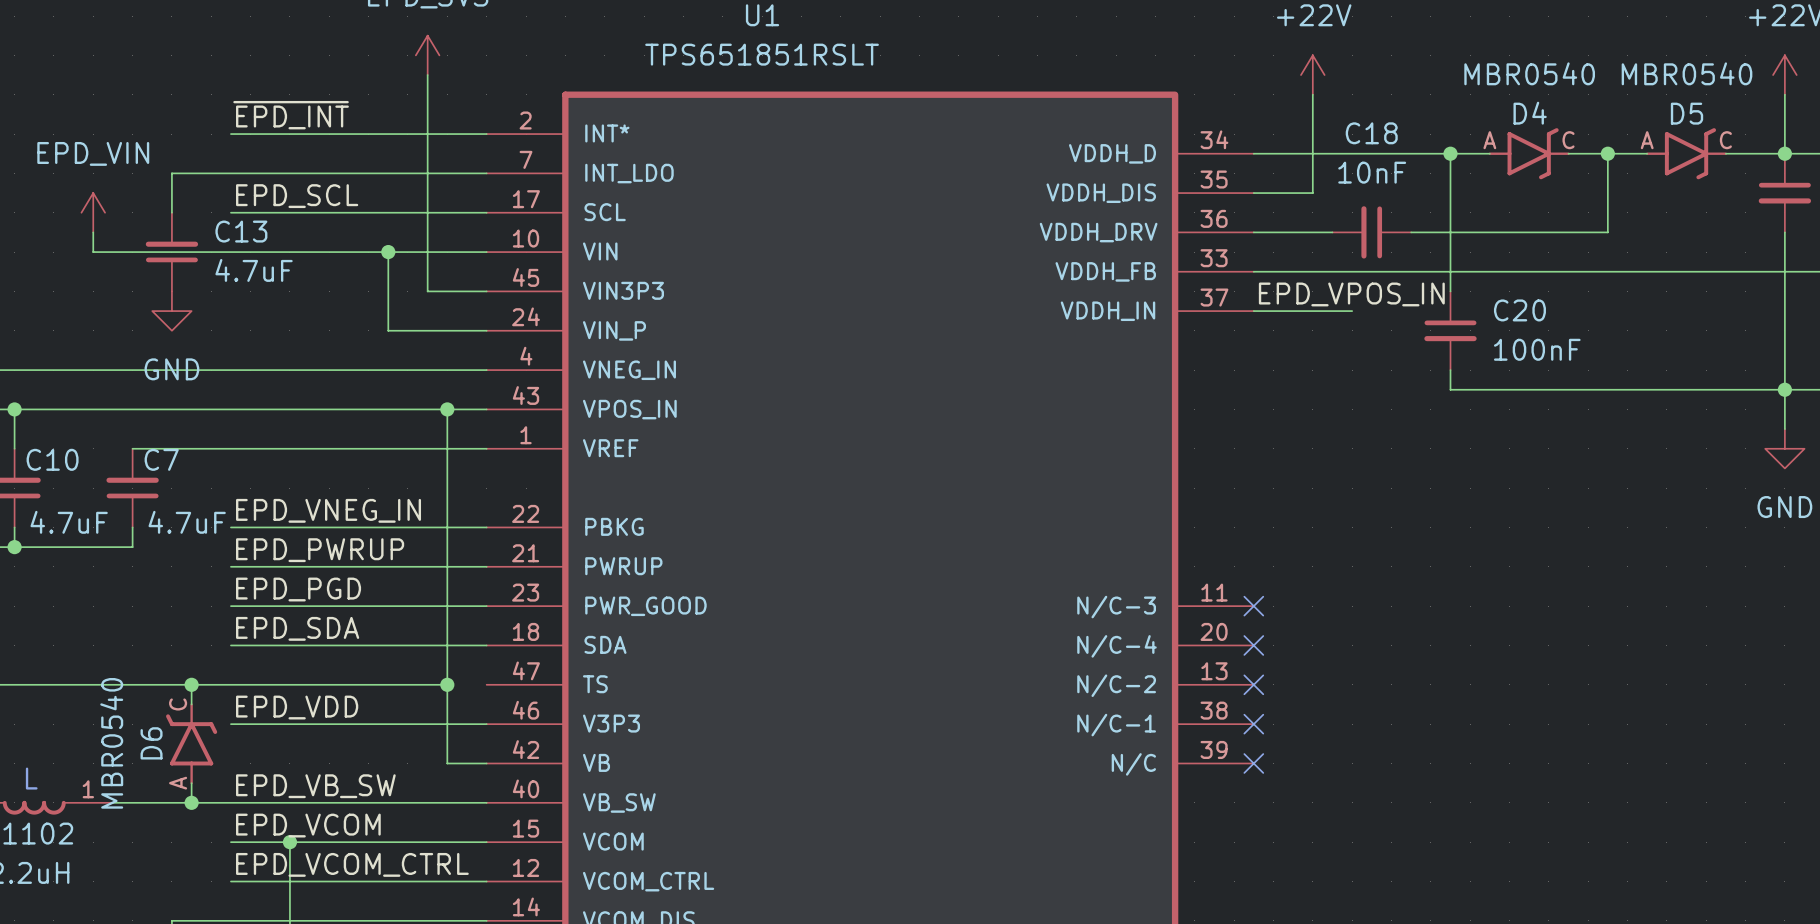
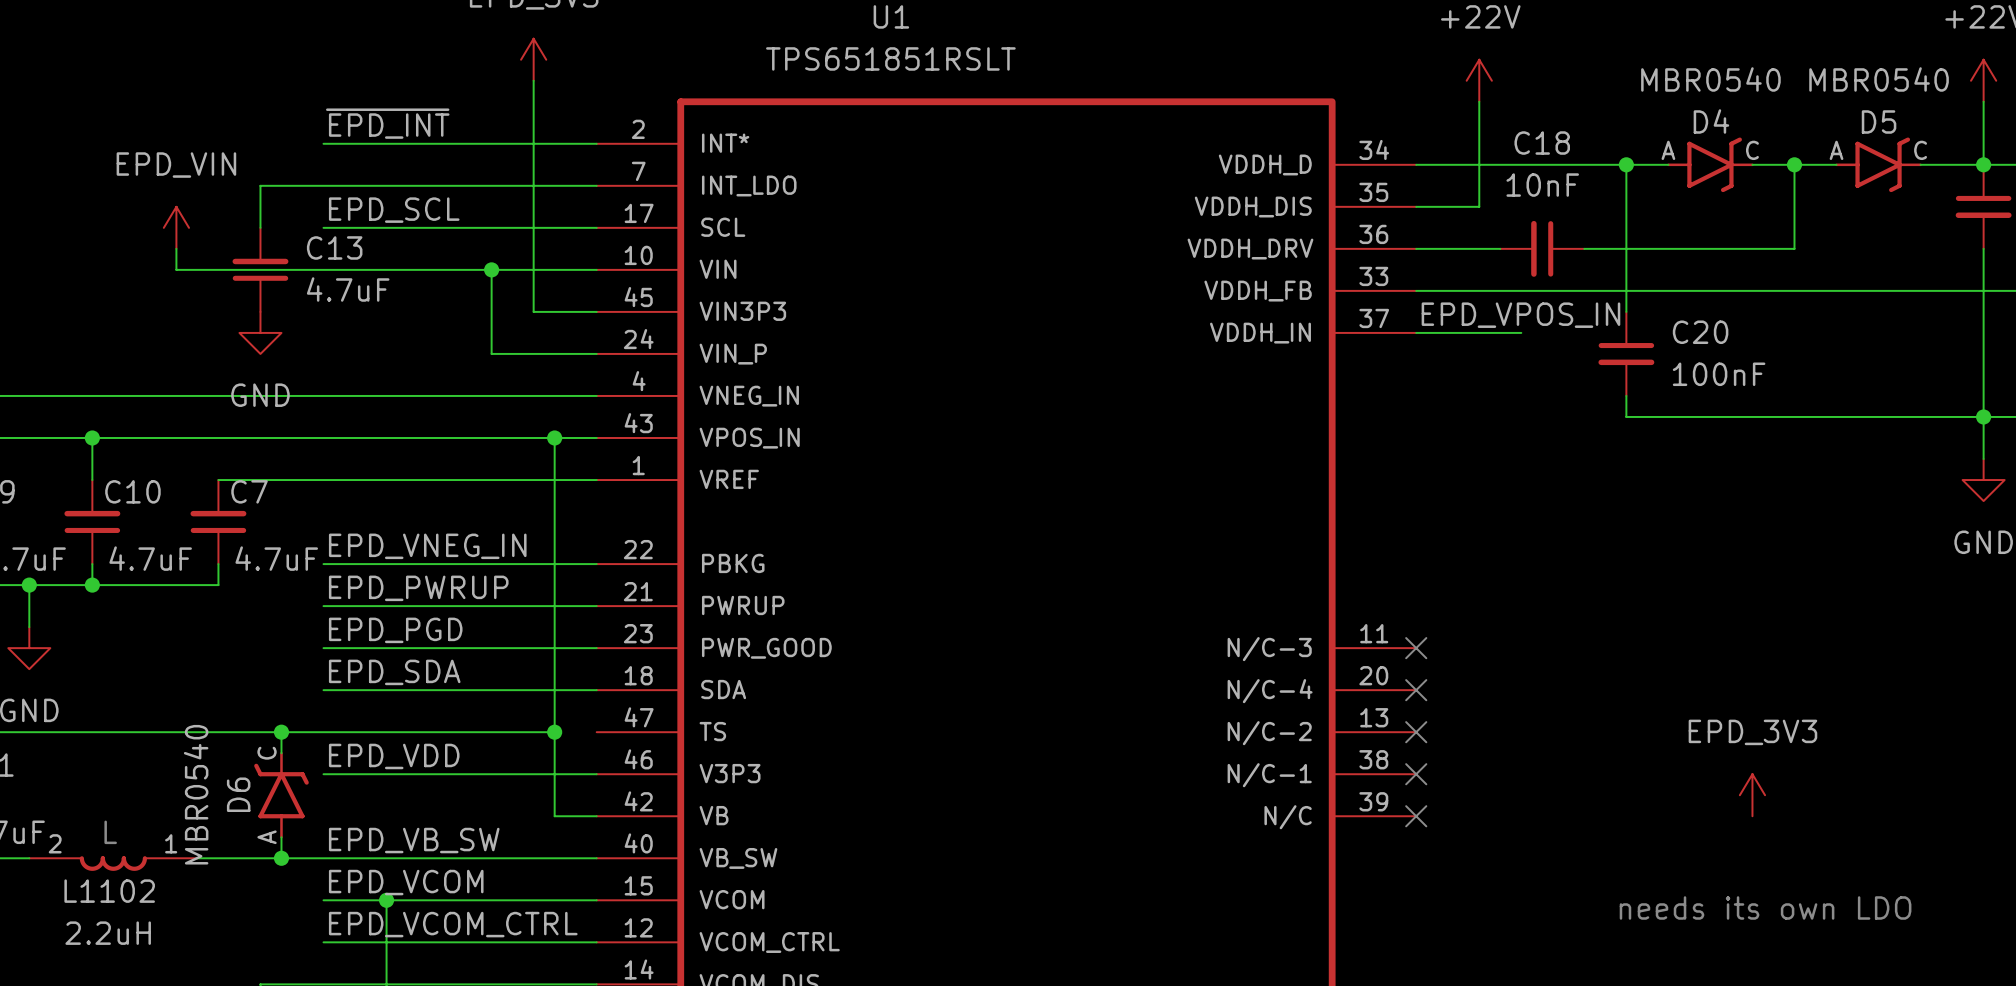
power symbol: none -> EPD_3V3 (1752, 795)
text: none -> needs its own LDO (1765, 907)

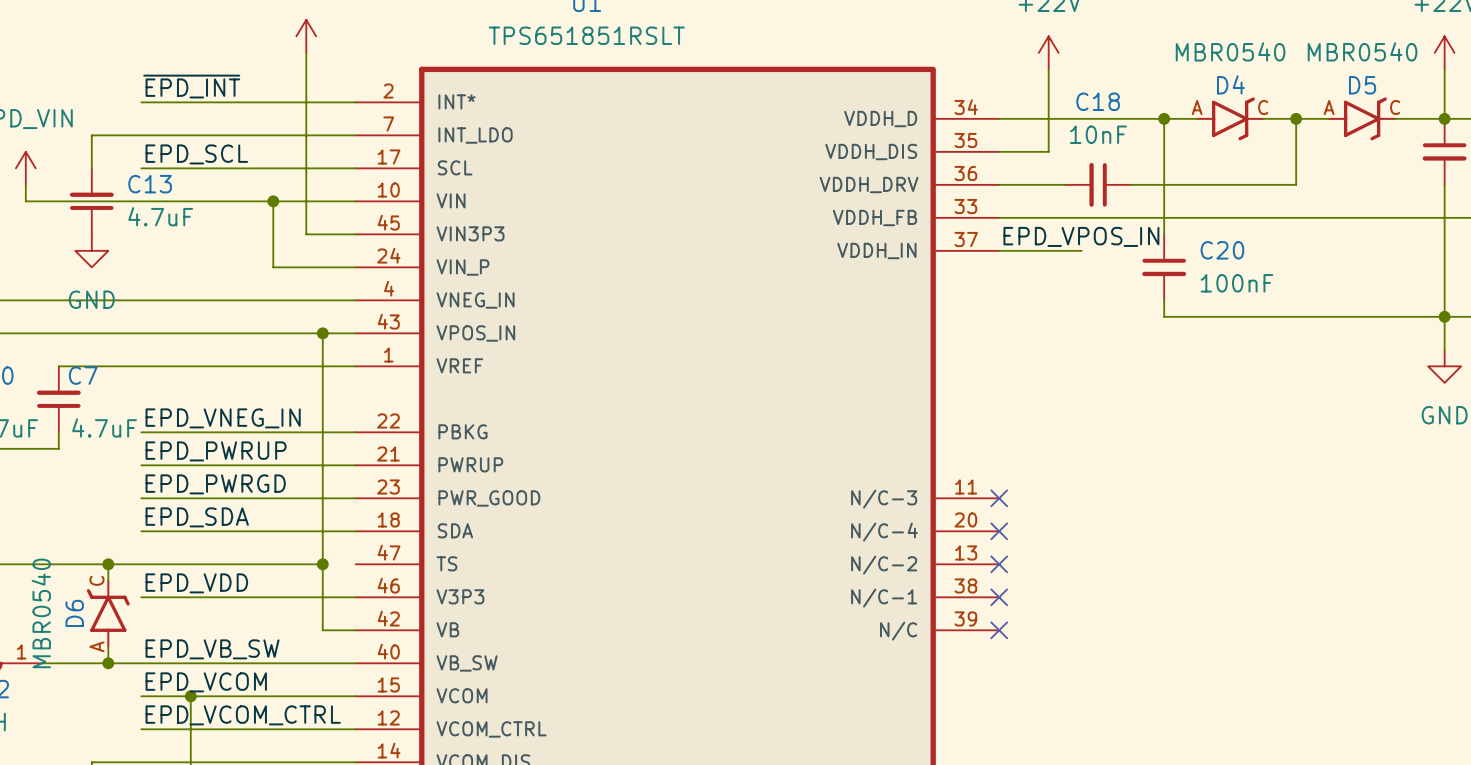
label: EPD_PGD (395, 630) -> EPD_PWRGD (215, 484)
power symbol: EPD_3V3 (1752, 795) -> none
text: needs its own LDO (1765, 907) -> none

